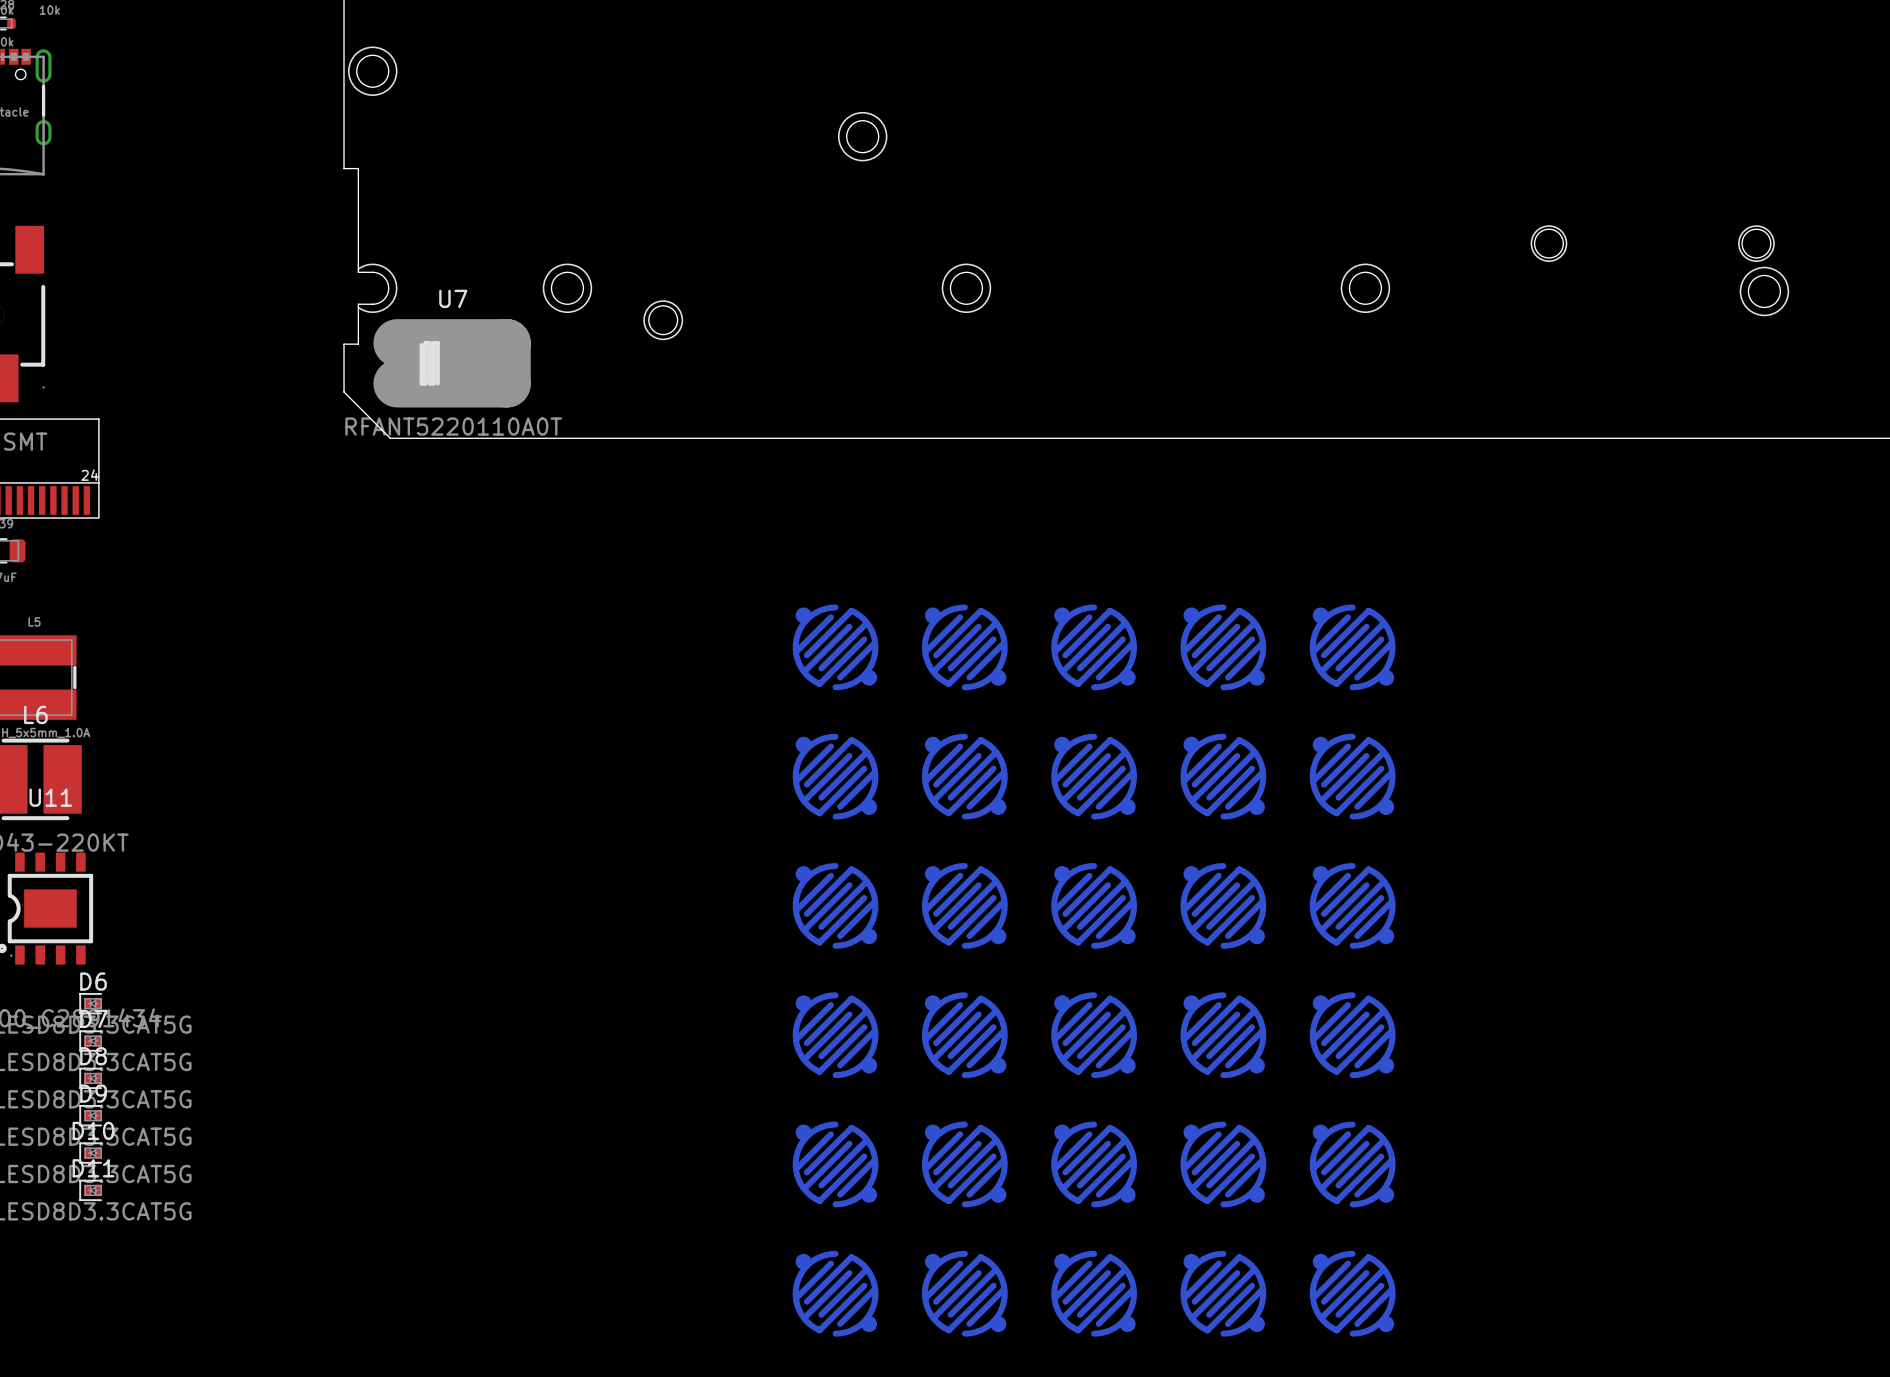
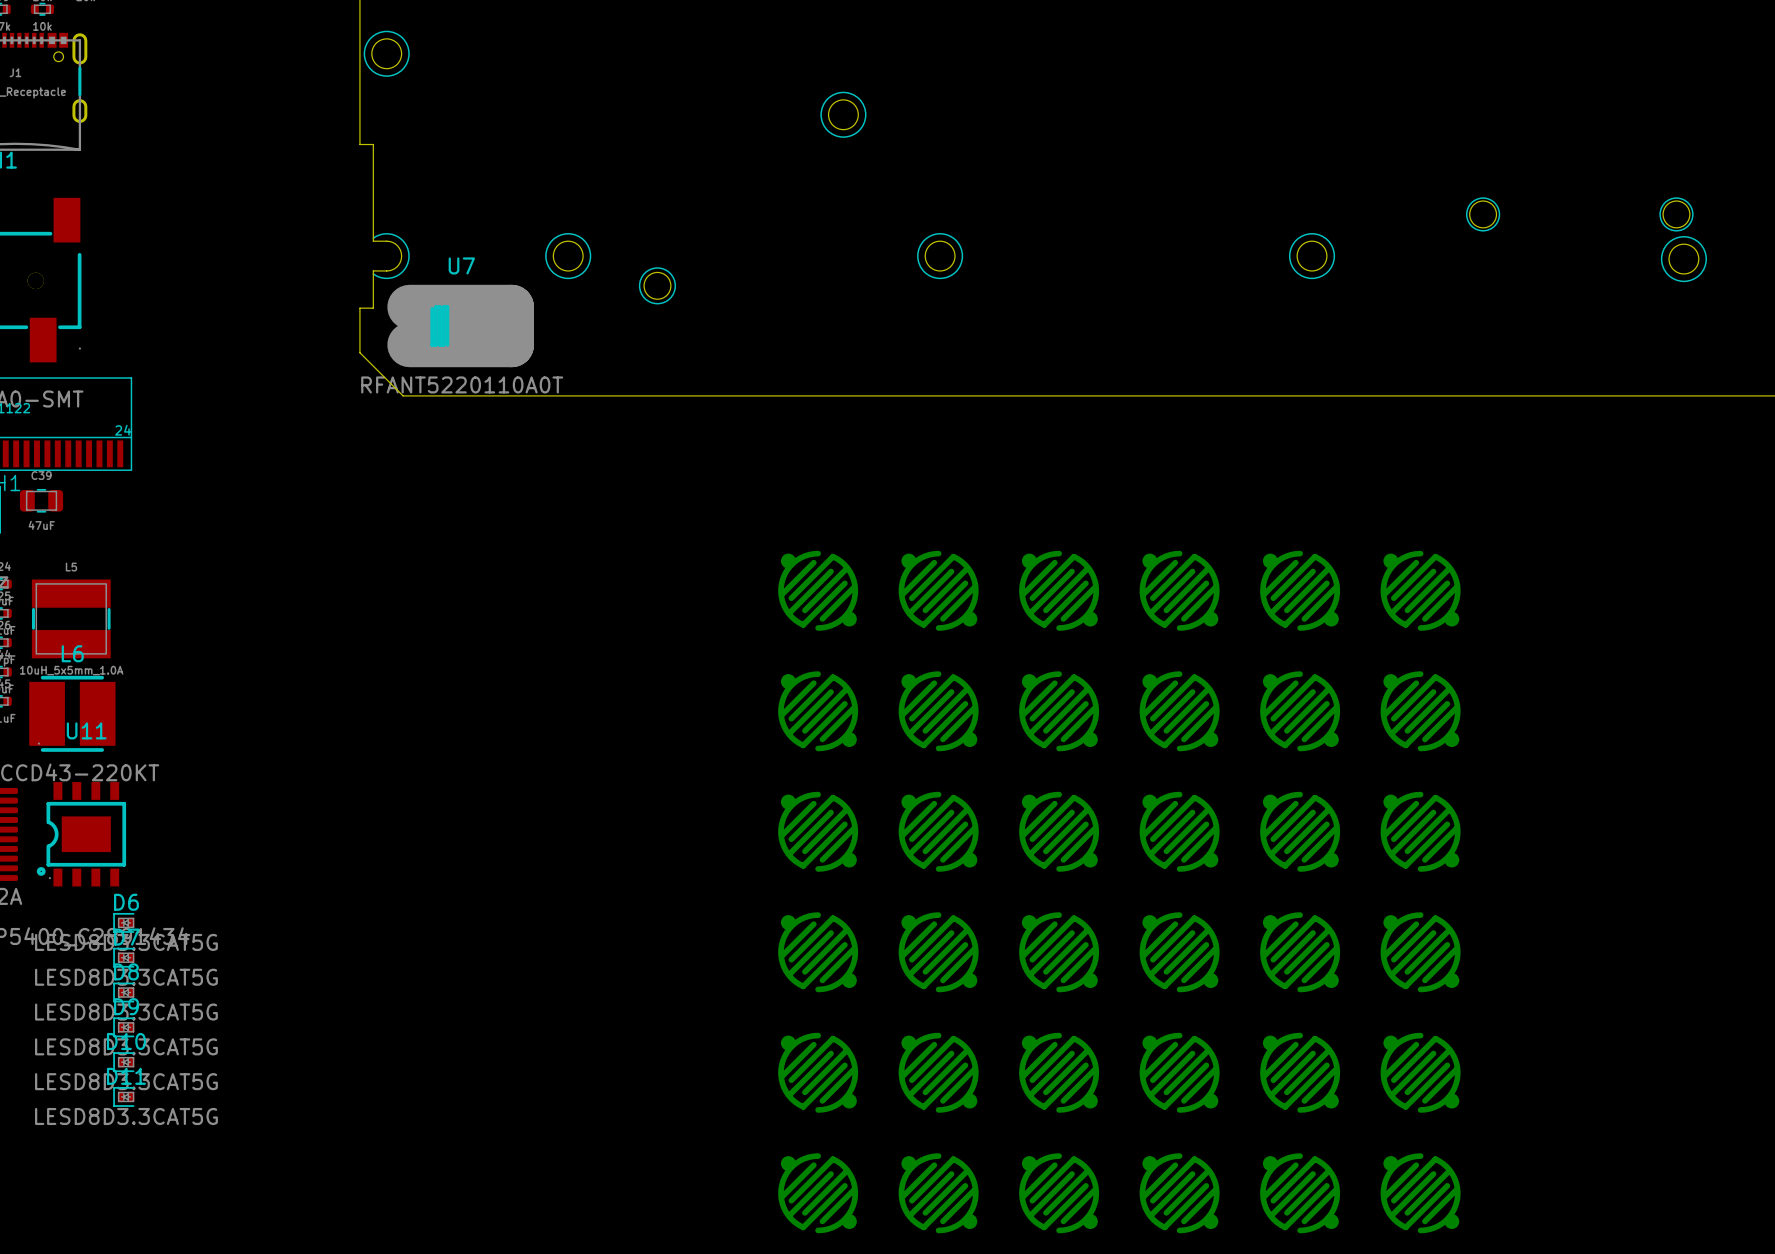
part: none -> (1420, 590)
part: none -> (1420, 711)
part: none -> (1420, 831)
part: none -> (1420, 952)
part: none -> (1420, 1072)
part: none -> (1420, 1193)

